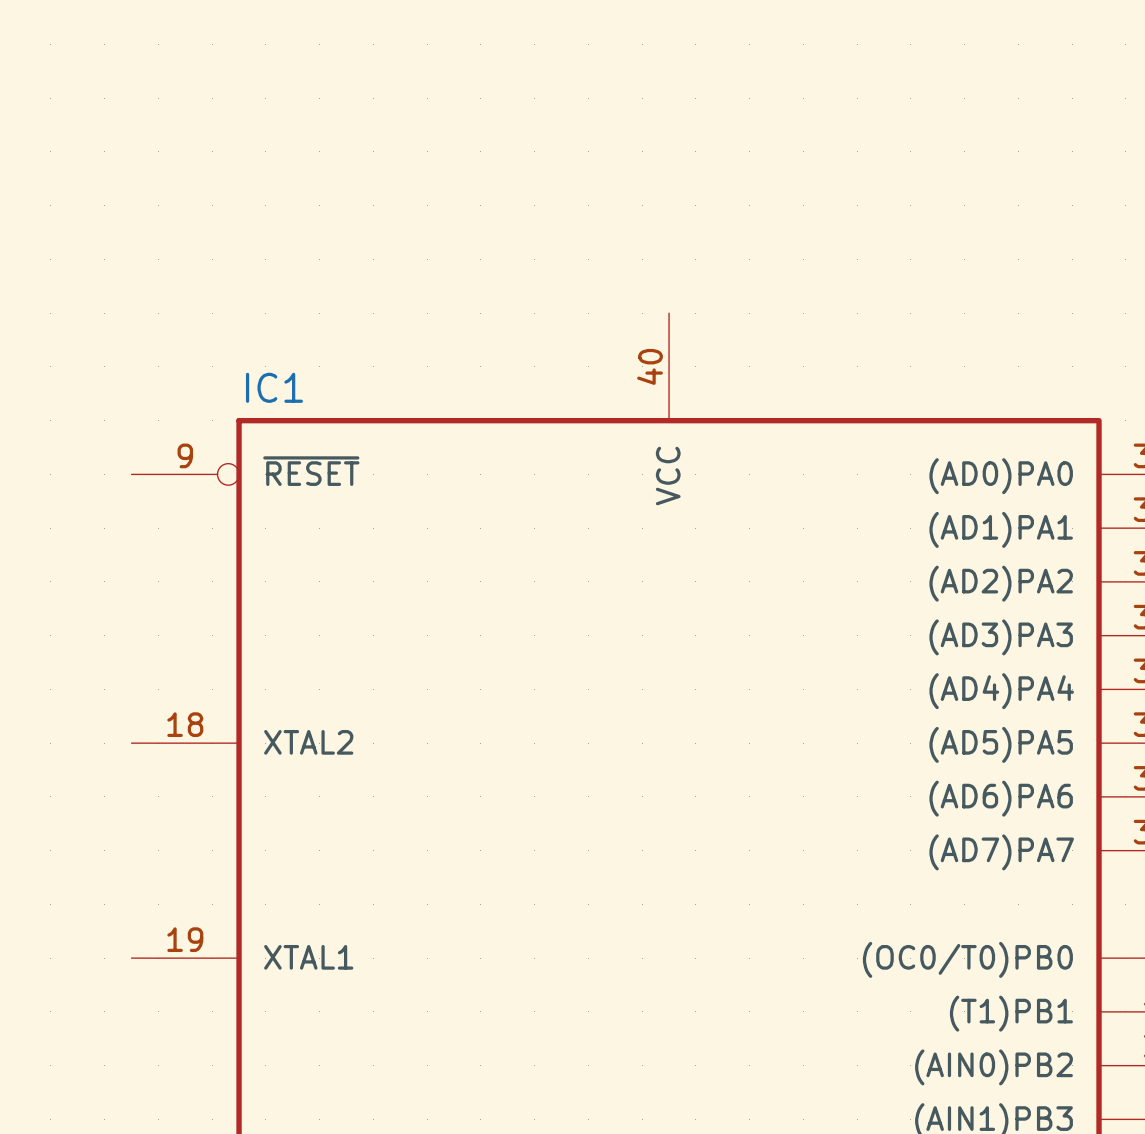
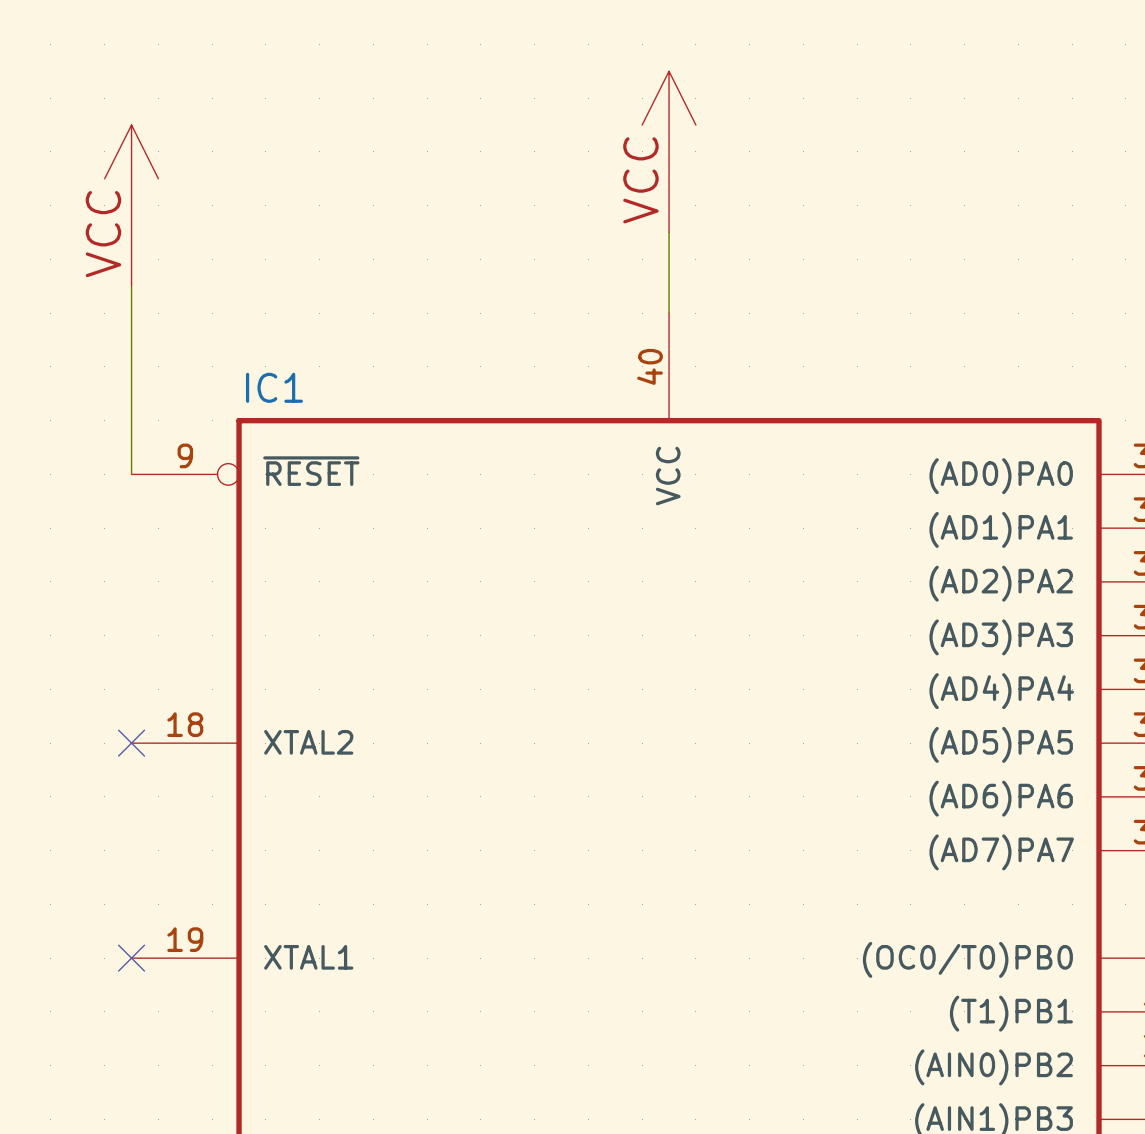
power symbol: none -> (669, 151)
power symbol: none -> (131, 205)
wire: none -> (669, 232) (669, 313)
wire: none -> (131, 286) (131, 474)
no-connect mark: none -> (131, 743)
no-connect mark: none -> (131, 958)

